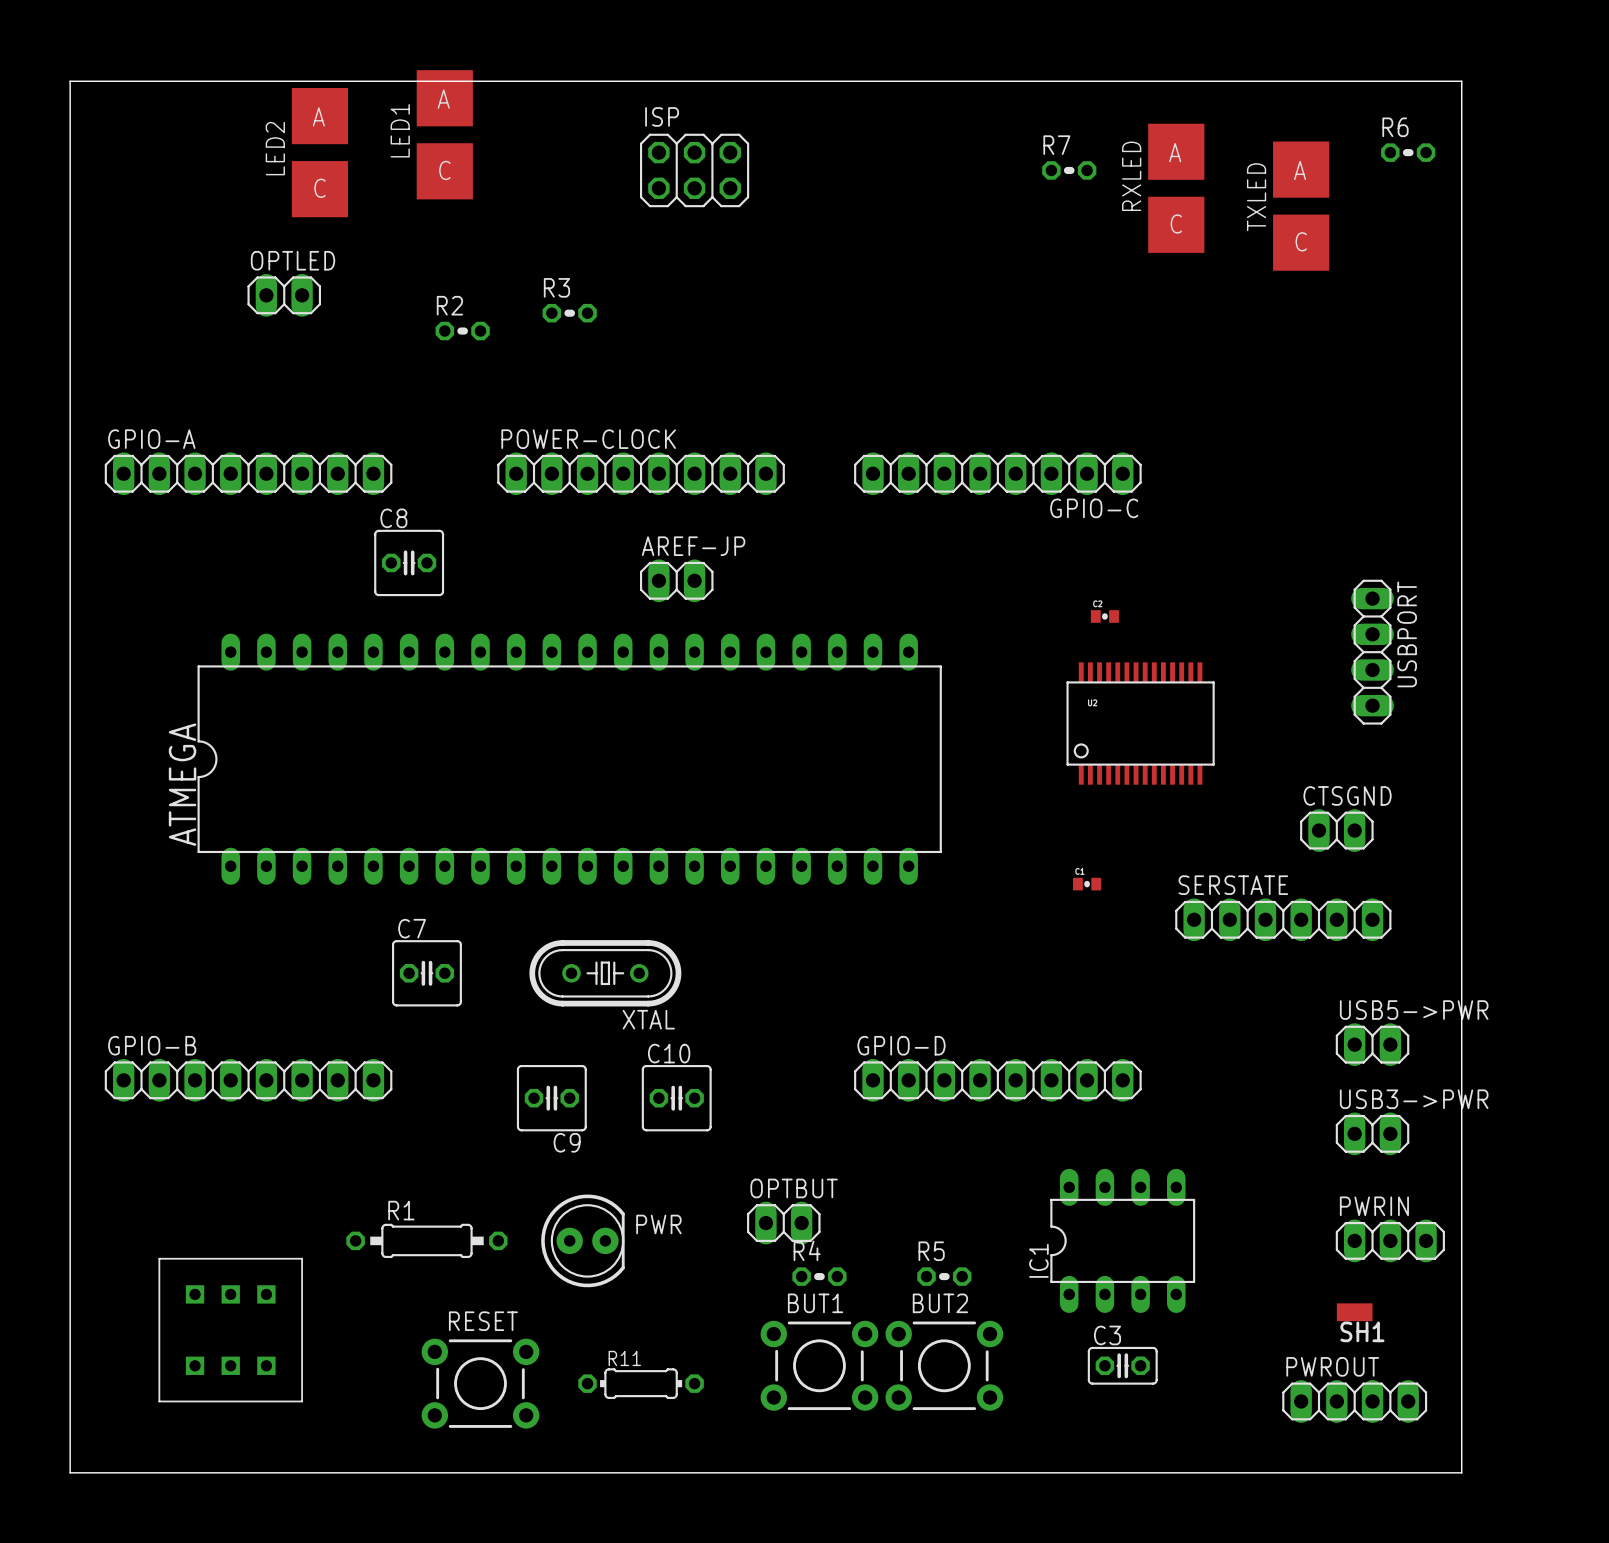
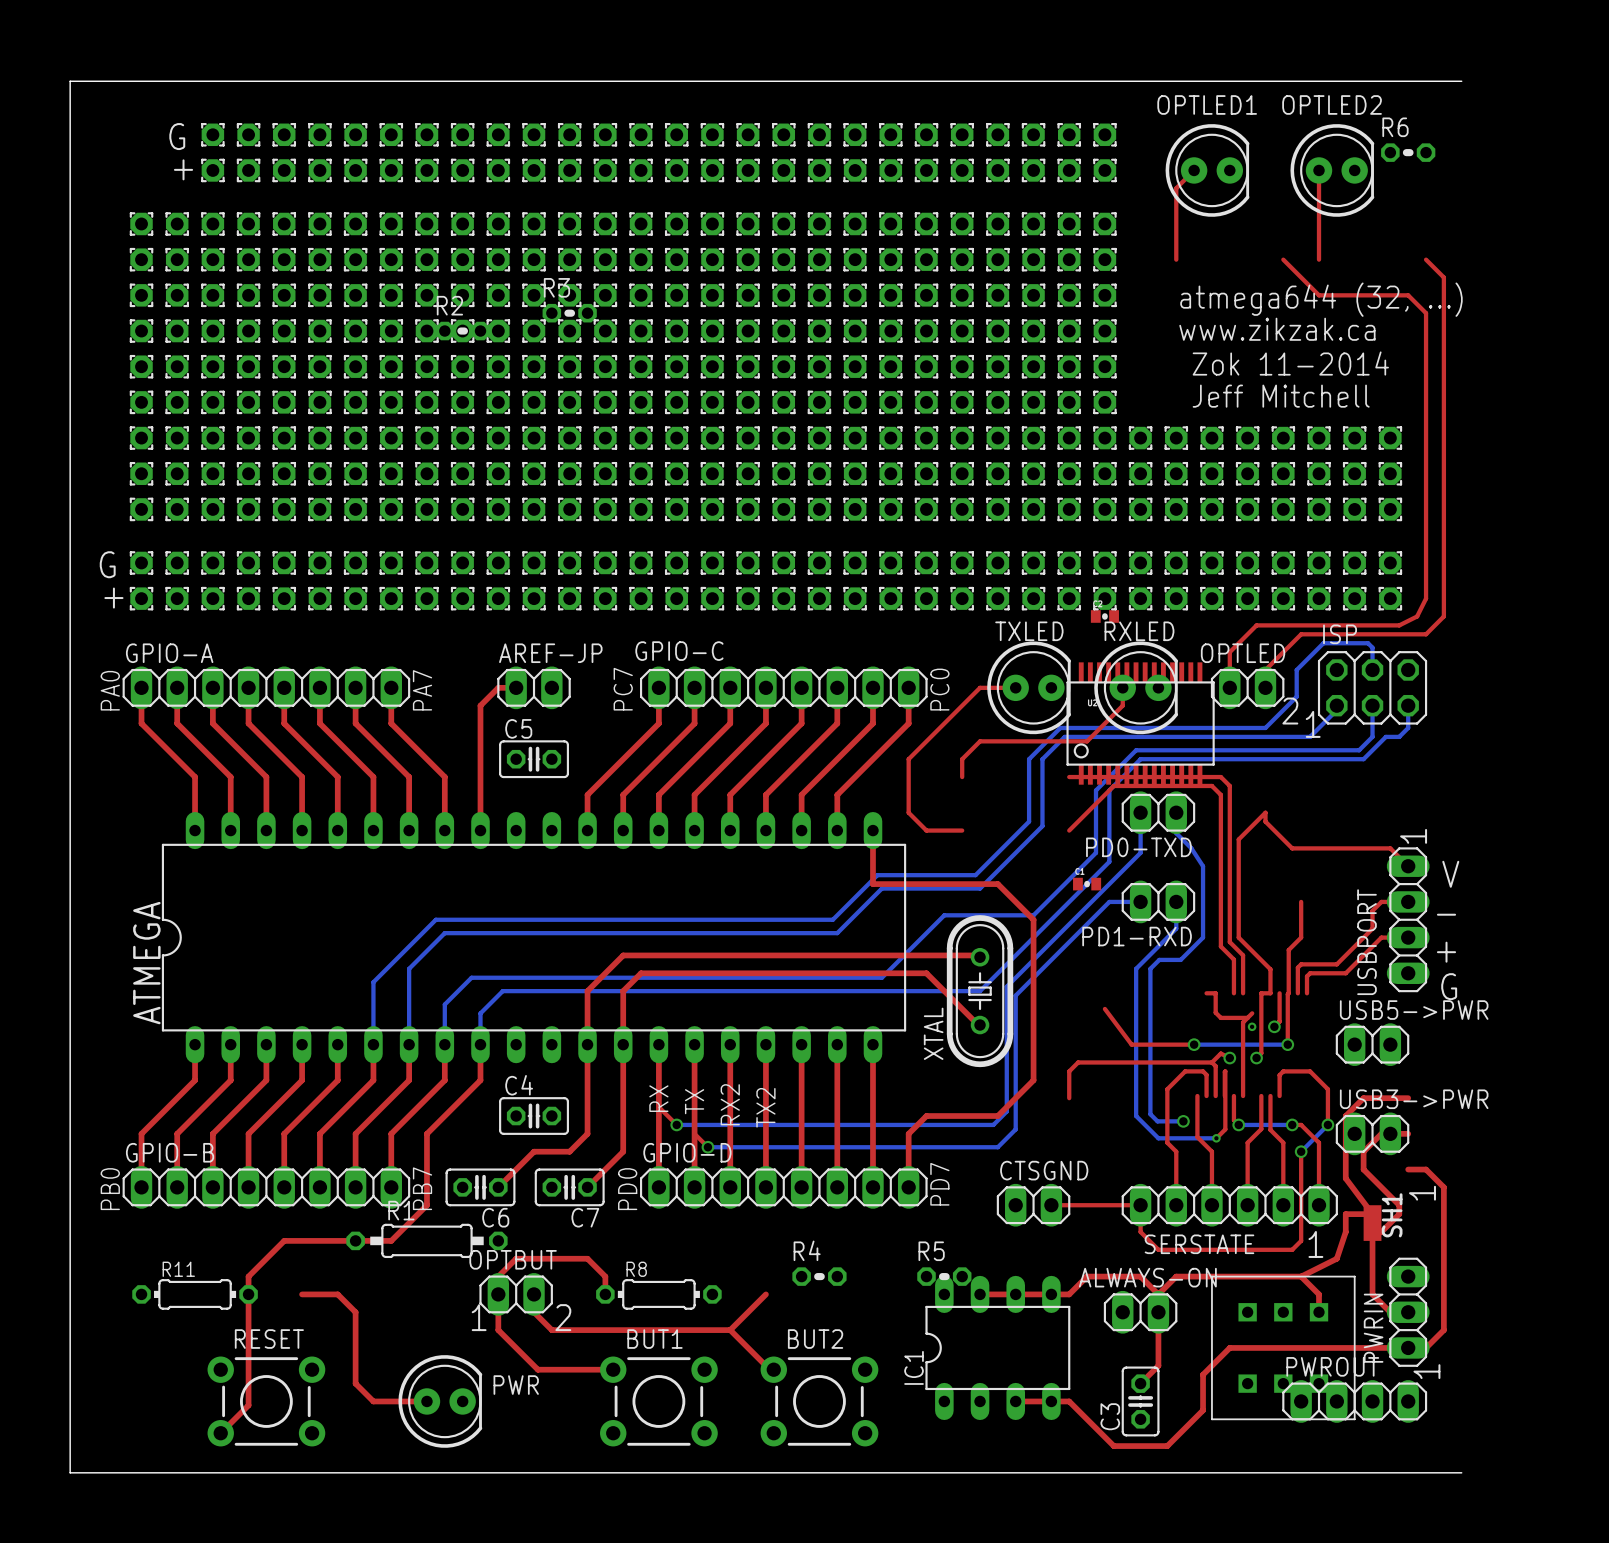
board edge: (1461, 81) (1461, 1472) -> none
part: none -> (212, 134)
part: none -> (248, 134)
part: none -> (284, 134)
part: none -> (319, 134)
part: none -> (355, 134)
part: none -> (391, 134)
part: none -> (426, 134)
LED1: (444, 134) -> none
part: none -> (462, 134)
part: none -> (498, 134)
part: none -> (534, 134)
part: none -> (569, 134)
part: none -> (605, 134)
part: none -> (641, 134)
part: none -> (676, 134)
part: none -> (712, 134)
part: none -> (748, 134)
part: none -> (783, 134)
part: none -> (819, 134)
part: none -> (855, 134)
part: none -> (890, 134)
part: none -> (926, 134)
part: none -> (962, 134)
part: none -> (997, 134)
part: none -> (1033, 134)
part: none -> (1069, 134)
part: none -> (1104, 134)
text: none -> G (177, 136)
LED2: (319, 152) -> none
text: none -> + (183, 169)
part: none -> (212, 170)
part: none -> (248, 170)
part: none -> (284, 170)
part: none -> (319, 170)
part: none -> (355, 170)
part: none -> (391, 170)
part: none -> (426, 170)
part: none -> (462, 170)
part: none -> (498, 170)
part: none -> (534, 170)
part: none -> (569, 170)
part: none -> (605, 170)
part: none -> (641, 170)
part: none -> (676, 170)
ISP: (694, 170) -> none
part: none -> (712, 170)
part: none -> (748, 170)
part: none -> (783, 170)
part: none -> (819, 170)
part: none -> (855, 170)
part: none -> (890, 170)
part: none -> (926, 170)
part: none -> (962, 170)
part: none -> (997, 170)
part: none -> (1033, 170)
R7: (1069, 170) -> none
part: none -> (1069, 170)
part: none -> (1104, 170)
top track: none -> (1194, 170) (1176, 188) (1176, 259)
OPTLED1: none -> (1207, 170)
top track: none -> (1319, 170) (1319, 259)
OPTLED2: none -> (1332, 170)
RXLED: (1176, 188) -> none
TXLED: (1301, 206) -> none
part: none -> (141, 223)
part: none -> (177, 223)
part: none -> (212, 223)
part: none -> (248, 223)
part: none -> (284, 223)
part: none -> (319, 223)
part: none -> (355, 223)
part: none -> (391, 223)
part: none -> (426, 223)
part: none -> (462, 223)
part: none -> (498, 223)
part: none -> (534, 223)
part: none -> (569, 223)
part: none -> (605, 223)
part: none -> (641, 223)
part: none -> (676, 223)
part: none -> (712, 223)
part: none -> (748, 223)
part: none -> (783, 223)
part: none -> (819, 223)
part: none -> (855, 223)
part: none -> (890, 223)
part: none -> (926, 223)
part: none -> (962, 223)
part: none -> (997, 223)
part: none -> (1033, 223)
part: none -> (1069, 223)
part: none -> (1104, 223)
part: none -> (141, 259)
part: none -> (177, 259)
part: none -> (212, 259)
part: none -> (248, 259)
part: none -> (284, 259)
part: none -> (319, 259)
part: none -> (355, 259)
part: none -> (391, 259)
part: none -> (426, 259)
part: none -> (462, 259)
part: none -> (498, 259)
part: none -> (534, 259)
part: none -> (569, 259)
part: none -> (605, 259)
part: none -> (641, 259)
part: none -> (676, 259)
part: none -> (712, 259)
part: none -> (748, 259)
part: none -> (783, 259)
part: none -> (819, 259)
part: none -> (855, 259)
part: none -> (890, 259)
part: none -> (926, 259)
part: none -> (962, 259)
part: none -> (997, 259)
part: none -> (1033, 259)
part: none -> (1069, 259)
part: none -> (1104, 259)
top track: none -> (1283, 259) (1319, 295) (1408, 295) (1426, 313) (1426, 598) (1417, 616) (1399, 625) (1256, 625) (1229, 652) (1229, 687)
top track: none -> (1426, 259) (1443, 277) (1443, 616) (1426, 634) (1301, 634) (1265, 670) (1265, 687)
part: none -> (141, 295)
part: none -> (177, 295)
part: none -> (212, 295)
part: none -> (248, 295)
OPTLED: (284, 295) -> none
part: none -> (284, 295)
part: none -> (319, 295)
part: none -> (355, 295)
part: none -> (391, 295)
part: none -> (426, 295)
part: none -> (462, 295)
part: none -> (498, 295)
part: none -> (534, 295)
part: none -> (569, 295)
part: none -> (605, 295)
part: none -> (641, 295)
part: none -> (676, 295)
part: none -> (712, 295)
part: none -> (748, 295)
part: none -> (783, 295)
part: none -> (819, 295)
part: none -> (855, 295)
part: none -> (890, 295)
part: none -> (926, 295)
part: none -> (962, 295)
part: none -> (997, 295)
part: none -> (1033, 295)
part: none -> (1069, 295)
part: none -> (1104, 295)
text: none -> atmega644 (32, ...) (1321, 299)
text: none -> www.zikzak.ca (1277, 329)
part: none -> (141, 331)
part: none -> (177, 331)
part: none -> (212, 331)
part: none -> (248, 331)
part: none -> (284, 331)
part: none -> (319, 331)
part: none -> (355, 331)
part: none -> (391, 331)
part: none -> (426, 331)
part: none -> (462, 331)
part: none -> (498, 331)
part: none -> (534, 331)
part: none -> (569, 331)
part: none -> (605, 331)
part: none -> (641, 331)
part: none -> (676, 331)
part: none -> (712, 331)
part: none -> (748, 331)
part: none -> (783, 331)
part: none -> (819, 331)
part: none -> (855, 331)
part: none -> (890, 331)
part: none -> (926, 331)
part: none -> (962, 331)
part: none -> (997, 331)
part: none -> (1033, 331)
part: none -> (1069, 331)
part: none -> (1104, 331)
text: none -> Zok 11-2014 (1290, 363)
part: none -> (141, 366)
part: none -> (177, 366)
part: none -> (212, 366)
part: none -> (248, 366)
part: none -> (284, 366)
part: none -> (319, 366)
part: none -> (355, 366)
part: none -> (391, 366)
part: none -> (426, 366)
part: none -> (462, 366)
part: none -> (498, 366)
part: none -> (534, 366)
part: none -> (569, 366)
part: none -> (605, 366)
part: none -> (641, 366)
part: none -> (676, 366)
part: none -> (712, 366)
part: none -> (748, 366)
part: none -> (783, 366)
part: none -> (819, 366)
part: none -> (855, 366)
part: none -> (890, 366)
part: none -> (926, 366)
part: none -> (962, 366)
part: none -> (997, 366)
part: none -> (1033, 366)
part: none -> (1069, 366)
part: none -> (1104, 366)
text: none -> Jeff Mitchell (1281, 396)
part: none -> (141, 402)
part: none -> (177, 402)
part: none -> (212, 402)
part: none -> (248, 402)
part: none -> (284, 402)
part: none -> (319, 402)
part: none -> (355, 402)
part: none -> (391, 402)
part: none -> (426, 402)
part: none -> (462, 402)
part: none -> (498, 402)
part: none -> (534, 402)
part: none -> (569, 402)
part: none -> (605, 402)
part: none -> (641, 402)
part: none -> (676, 402)
part: none -> (712, 402)
part: none -> (748, 402)
part: none -> (783, 402)
part: none -> (819, 402)
part: none -> (855, 402)
part: none -> (890, 402)
part: none -> (926, 402)
part: none -> (962, 402)
part: none -> (997, 402)
part: none -> (1033, 402)
part: none -> (1069, 402)
part: none -> (1104, 402)
part: none -> (141, 438)
part: none -> (177, 438)
part: none -> (212, 438)
part: none -> (248, 438)
part: none -> (284, 438)
part: none -> (319, 438)
part: none -> (355, 438)
part: none -> (391, 438)
part: none -> (426, 438)
part: none -> (462, 438)
part: none -> (498, 438)
part: none -> (534, 438)
part: none -> (569, 438)
part: none -> (605, 438)
part: none -> (641, 438)
part: none -> (676, 438)
part: none -> (712, 438)
part: none -> (748, 438)
part: none -> (783, 438)
part: none -> (819, 438)
part: none -> (855, 438)
part: none -> (890, 438)
part: none -> (926, 438)
part: none -> (962, 438)
part: none -> (997, 438)
part: none -> (1033, 438)
part: none -> (1069, 438)
part: none -> (1104, 438)
part: none -> (1140, 438)
part: none -> (1176, 438)
part: none -> (1211, 438)
part: none -> (1247, 438)
part: none -> (1283, 438)
part: none -> (1319, 438)
part: none -> (1354, 438)
part: none -> (1390, 438)
part: none -> (141, 473)
part: none -> (177, 473)
part: none -> (212, 473)
GPIO-A position: (248, 473) -> (266, 687)
part: none -> (248, 473)
part: none -> (284, 473)
part: none -> (319, 473)
part: none -> (355, 473)
part: none -> (391, 473)
part: none -> (426, 473)
part: none -> (462, 473)
part: none -> (498, 473)
part: none -> (534, 473)
part: none -> (569, 473)
part: none -> (605, 473)
POWER-CLOCK: (641, 473) -> none
part: none -> (641, 473)
part: none -> (676, 473)
part: none -> (712, 473)
part: none -> (748, 473)
part: none -> (783, 473)
part: none -> (819, 473)
part: none -> (855, 473)
part: none -> (890, 473)
part: none -> (926, 473)
part: none -> (962, 473)
GPIO-C position: (997, 473) -> (783, 687)
part: none -> (997, 473)
part: none -> (1033, 473)
part: none -> (1069, 473)
part: none -> (1104, 473)
part: none -> (1140, 473)
part: none -> (1176, 473)
part: none -> (1211, 473)
part: none -> (1247, 473)
part: none -> (1283, 473)
part: none -> (1319, 473)
part: none -> (1354, 473)
part: none -> (1390, 473)
GPIO-C name position: GPIO-C (1094, 508) -> GPIO-C (679, 651)
part: none -> (141, 509)
part: none -> (177, 509)
part: none -> (212, 509)
part: none -> (248, 509)
part: none -> (284, 509)
part: none -> (319, 509)
part: none -> (355, 509)
part: none -> (391, 509)
part: none -> (426, 509)
part: none -> (462, 509)
part: none -> (498, 509)
part: none -> (534, 509)
part: none -> (569, 509)
part: none -> (605, 509)
part: none -> (641, 509)
part: none -> (676, 509)
part: none -> (712, 509)
part: none -> (748, 509)
part: none -> (783, 509)
part: none -> (819, 509)
part: none -> (855, 509)
part: none -> (890, 509)
part: none -> (926, 509)
part: none -> (962, 509)
part: none -> (997, 509)
part: none -> (1033, 509)
part: none -> (1069, 509)
part: none -> (1104, 509)
part: none -> (1140, 509)
part: none -> (1176, 509)
part: none -> (1211, 509)
part: none -> (1247, 509)
part: none -> (1283, 509)
part: none -> (1319, 509)
part: none -> (1354, 509)
part: none -> (1390, 509)
part: none -> (141, 562)
part: none -> (177, 562)
part: none -> (212, 562)
part: none -> (248, 562)
part: none -> (284, 562)
part: none -> (319, 562)
part: none -> (355, 562)
part: none -> (391, 562)
C8: (409, 562) -> none
part: none -> (426, 562)
part: none -> (462, 562)
part: none -> (498, 562)
part: none -> (534, 562)
part: none -> (569, 562)
part: none -> (605, 562)
part: none -> (641, 562)
part: none -> (676, 562)
part: none -> (712, 562)
part: none -> (748, 562)
part: none -> (783, 562)
part: none -> (819, 562)
part: none -> (855, 562)
part: none -> (890, 562)
part: none -> (926, 562)
part: none -> (962, 562)
part: none -> (997, 562)
part: none -> (1033, 562)
part: none -> (1069, 562)
part: none -> (1104, 562)
part: none -> (1140, 562)
part: none -> (1176, 562)
part: none -> (1211, 562)
part: none -> (1247, 562)
part: none -> (1283, 562)
part: none -> (1319, 562)
part: none -> (1354, 562)
part: none -> (1390, 562)
text: none -> G (107, 564)
AREF-JP position: (676, 580) -> (534, 687)
text: none -> + (113, 598)
part: none -> (141, 598)
part: none -> (177, 598)
part: none -> (212, 598)
part: none -> (248, 598)
part: none -> (284, 598)
part: none -> (319, 598)
part: none -> (355, 598)
part: none -> (391, 598)
part: none -> (426, 598)
part: none -> (462, 598)
part: none -> (498, 598)
part: none -> (534, 598)
part: none -> (569, 598)
part: none -> (605, 598)
part: none -> (641, 598)
part: none -> (676, 598)
part: none -> (712, 598)
part: none -> (748, 598)
part: none -> (783, 598)
part: none -> (819, 598)
part: none -> (855, 598)
part: none -> (890, 598)
part: none -> (926, 598)
part: none -> (962, 598)
part: none -> (997, 598)
part: none -> (1033, 598)
part: none -> (1069, 598)
part: none -> (1104, 598)
part: none -> (1140, 598)
part: none -> (1176, 598)
part: none -> (1211, 598)
part: none -> (1247, 598)
part: none -> (1283, 598)
part: none -> (1319, 598)
part: none -> (1354, 598)
part: none -> (1390, 598)
USBPORT name position: USBPORT (1407, 634) -> USBPORT (1367, 942)
USBPORT position: (1372, 652) -> (1408, 919)
bottom track: none -> (1372, 670) (1372, 647) (1368, 643) (1323, 643) (1296, 670) (1296, 696) (1265, 727) (1060, 727) (1029, 759) (1029, 821) (975, 875) (877, 875) (832, 919) (435, 919) (373, 982) (373, 1044)
top track: none -> (141, 687) (141, 723) (195, 777) (195, 830)
top track: none -> (177, 687) (177, 723) (230, 777) (230, 830)
top track: none -> (212, 687) (212, 723) (266, 777) (266, 830)
top track: none -> (248, 687) (248, 723) (302, 777) (302, 830)
top track: none -> (284, 687) (284, 723) (337, 777) (337, 830)
top track: none -> (319, 687) (319, 723) (373, 777) (373, 830)
top track: none -> (355, 687) (355, 723) (409, 777) (409, 830)
top track: none -> (391, 687) (391, 723) (444, 777) (444, 830)
top track: none -> (516, 687) (498, 687) (480, 705) (480, 830)
top track: none -> (658, 687) (658, 723) (587, 794) (587, 830)
top track: none -> (694, 687) (694, 723) (623, 794) (623, 830)
top track: none -> (730, 687) (730, 723) (658, 794) (658, 830)
top track: none -> (765, 687) (765, 723) (694, 794) (694, 830)
top track: none -> (801, 687) (801, 723) (730, 794) (730, 830)
top track: none -> (837, 687) (837, 723) (765, 794) (765, 830)
top track: none -> (872, 687) (872, 723) (801, 794) (801, 830)
top track: none -> (908, 687) (908, 723) (837, 794) (837, 830)
top track: none -> (1015, 687) (980, 687) (908, 759) (908, 812) (926, 830) (962, 830)
TXLED: none -> (1029, 687)
top track: none -> (1122, 687) (1122, 705) (1087, 741) (980, 741) (962, 759) (962, 777)
RXLED: none -> (1136, 687)
OPTLED: none -> (1247, 687)
ISP: none -> (1372, 687)
text: none -> PC7 (623, 689)
text: none -> PC0 (939, 689)
text: none -> PA0 (110, 690)
text: none -> PA7 (422, 690)
bottom track: none -> (1336, 705) (1336, 710) (1310, 736) (1064, 736) (1042, 759) (1042, 826) (980, 888) (881, 888) (837, 933) (444, 933) (409, 968) (409, 1044)
bottom track: none -> (1372, 705) (1372, 736) (1359, 750) (1136, 750) (1096, 790) (1096, 852) (1033, 915) (944, 915) (881, 977) (471, 977) (444, 1004) (444, 1044)
bottom track: none -> (1408, 705) (1408, 727) (1399, 736) (1385, 736) (1363, 759) (1140, 759) (1109, 790) (1109, 861) (980, 991) (502, 991) (480, 1013) (480, 1044)
text: none -> 2 (1290, 711)
text: none -> 1 (1313, 724)
C5: none -> (534, 759)
ATMEGA position: (569, 759) -> (534, 937)
top track: none -> (1069, 777) (1220, 777) (1229, 785) (1229, 942) (1243, 955) (1243, 993)
bottom track: none -> (1140, 812) (1140, 852) (1006, 986) (1006, 1111) (993, 1124) (676, 1124)
PD0-TXD: none -> (1158, 812)
bottom track: none -> (1176, 812) (1176, 833) (1191, 848) (1203, 866) (1203, 937) (1180, 959) (1159, 959) (1150, 968) (1150, 1114) (1157, 1121) (1183, 1121)
top track: none -> (872, 830) (872, 884) (997, 884) (1033, 919) (1033, 1080) (997, 1116) (926, 1116) (908, 1133) (908, 1187)
top track: none -> (1069, 830) (1113, 785) (1211, 785) (1220, 794) (1220, 946) (1233, 959) (1233, 993)
CTSGND: (1336, 830) -> none
text: none -> 1 (1413, 836)
top track: none -> (1408, 866) (1390, 848) (1292, 848) (1265, 821) (1265, 812) (1238, 839) (1238, 937) (1270, 969) (1270, 993) (1261, 993) (1261, 1053) (1256, 1058)
text: none -> V (1450, 874)
SERSTATE name position: SERSTATE (1233, 885) -> SERSTATE (1199, 1244)
bottom track: none -> (1140, 901) (1109, 901) (1015, 995) (1015, 1129) (997, 1147) (707, 1147)
PD1-RXD: none -> (1158, 901)
bottom track: none -> (1176, 901) (1176, 928) (1136, 968) (1136, 1116) (1158, 1138) (1216, 1138)
top track: none -> (1301, 901) (1301, 937) (1288, 950) (1287, 1044)
top track: none -> (1408, 901) (1381, 901) (1372, 910) (1372, 928) (1336, 964) (1301, 964) (1297, 967) (1297, 993)
text: none -> - (1446, 914)
SERSTATE position: (1283, 919) -> (1229, 1205)
C7 name position: C7 (412, 928) -> C7 (585, 1217)
top track: none -> (1408, 937) (1381, 937) (1345, 973) (1310, 973) (1306, 976) (1306, 993)
C7 footprint: [392, 940, 462, 1007] -> [534, 1168, 605, 1207]
text: none -> + (1446, 952)
top track: none -> (980, 957) (978, 955) (623, 955) (587, 991) (587, 1133) (569, 1151) (534, 1151) (498, 1187)
XTAL: (605, 973) -> none
text: none -> G (1449, 986)
XTAL: none -> (980, 991)
top track: none -> (1206, 993) (1215, 993) (1215, 1012) (1220, 1017) (1247, 1017)
top track: none -> (1279, 993) (1279, 1021) (1274, 1026)
top track: none -> (1104, 1008) (1131, 1044) (1194, 1044)
top track: none -> (1252, 1013) (1243, 1022) (1243, 1096)
top track: none -> (980, 1025) (926, 973) (641, 973) (623, 991) (623, 1151) (587, 1187)
via: none -> (1252, 1026)
via: none -> (1274, 1026)
top track: none -> (195, 1044) (195, 1080) (141, 1133) (141, 1187)
top track: none -> (230, 1044) (230, 1080) (177, 1133) (177, 1187)
top track: none -> (266, 1044) (266, 1080) (212, 1133) (212, 1187)
top track: none -> (302, 1044) (302, 1080) (248, 1133) (248, 1187)
top track: none -> (337, 1044) (337, 1080) (284, 1133) (284, 1187)
top track: none -> (373, 1044) (373, 1080) (319, 1133) (319, 1187)
top track: none -> (409, 1044) (409, 1080) (355, 1133) (355, 1187)
top track: none -> (444, 1044) (444, 1080) (391, 1133) (391, 1187)
top track: none -> (480, 1044) (480, 1080) (426, 1133) (426, 1205) (391, 1240) (284, 1240) (248, 1276) (248, 1405) (220, 1433)
top track: none -> (730, 1044) (730, 1187)
top track: none -> (765, 1044) (765, 1187)
top track: none -> (801, 1044) (801, 1187)
top track: none -> (837, 1044) (837, 1187)
top track: none -> (872, 1044) (872, 1187)
bottom track: none -> (1194, 1044) (1287, 1044)
via: none -> (1194, 1044)
via: none -> (1287, 1044)
top track: none -> (1229, 1058) (1220, 1053) (1211, 1062)
via: none -> (1229, 1058)
via: none -> (1256, 1058)
top track: none -> (1211, 1062) (1215, 1066) (1215, 1096)
top track: none -> (1211, 1062) (1078, 1062) (1069, 1071) (1069, 1098)
GPIO-B position: (248, 1080) -> (266, 1187)
GPIO-D position: (997, 1080) -> (783, 1187)
top track: none -> (1197, 1096) (1197, 1137) (1211, 1151) (1211, 1205)
top track: none -> (1206, 1096) (1206, 1074) (1203, 1071) (1185, 1071) (1167, 1089) (1167, 1142) (1176, 1151) (1176, 1205)
top track: none -> (1224, 1096) (1225, 1071) (1225, 1129) (1216, 1138)
top track: none -> (1233, 1096) (1233, 1120) (1238, 1124)
top track: none -> (1261, 1096) (1261, 1129) (1247, 1142) (1247, 1205)
top track: none -> (1270, 1096) (1270, 1129) (1283, 1142) (1283, 1205)
top track: none -> (1279, 1096) (1279, 1075) (1283, 1071) (1310, 1071) (1327, 1089) (1327, 1124)
C9: (551, 1098) -> none
text: none -> RX (658, 1098)
C10: (676, 1098) -> none
top track: none -> (1408, 1098) (1363, 1098) (1345, 1116) (1345, 1178) (1372, 1214) (1345, 1214) (1345, 1231) (1336, 1258) (1301, 1276)
text: none -> TX (694, 1101)
text: none -> RX2 (730, 1104)
text: none -> TX2 (765, 1107)
C4: none -> (534, 1116)
via: none -> (1183, 1121)
top track: none -> (676, 1124) (658, 1107) (658, 1044) (658, 1187)
via: none -> (676, 1124)
bottom track: none -> (1238, 1124) (1292, 1124)
via: none -> (1238, 1124)
top track: none -> (1292, 1124) (1301, 1124) (1319, 1142) (1319, 1205)
via: none -> (1292, 1124)
bottom track: none -> (1327, 1124) (1301, 1151)
via: none -> (1327, 1124)
top track: none -> (1408, 1133) (1381, 1133) (1363, 1151) (1363, 1169) (1399, 1205) (1399, 1214) (1381, 1231) (1372, 1231) (1372, 1294) (1390, 1312) (1408, 1312)
via: none -> (1216, 1138)
top track: none -> (707, 1147) (694, 1133) (694, 1044) (694, 1187)
via: none -> (707, 1147)
top track: none -> (1301, 1151) (1301, 1240) (1292, 1249) (1158, 1249) (1140, 1231) (1140, 1205) (1051, 1205)
via: none -> (1301, 1151)
top track: none -> (1408, 1169) (1426, 1169) (1443, 1187) (1443, 1330) (1426, 1347) (1229, 1347) (1203, 1374) (1203, 1410) (1167, 1446) (1113, 1446) (1069, 1401) (1015, 1401)
text: none -> PD7 (939, 1184)
C6: none -> (480, 1187)
text: none -> PB7 (422, 1188)
OPTBUT name position: OPTBUT (794, 1188) -> OPTBUT (513, 1259)
text: none -> PB0 (110, 1189)
text: none -> PD0 (627, 1189)
text: none -> 1 (1422, 1193)
CTSGND: none -> (1033, 1205)
PWRIN name position: PWRIN (1374, 1206) -> PWRIN (1373, 1328)
OPTBUT position: (783, 1223) -> (516, 1294)
PWR position: (583, 1240) -> (440, 1401)
IC1 position: (1122, 1240) -> (997, 1347)
PWRIN rotation: 0° (1390, 1240) -> 90° clockwise (1408, 1312)
PWRIN position: (1390, 1240) -> (1408, 1312)
text: none -> 1 (1315, 1244)
top track: none -> (1301, 1276) (1176, 1276) (1158, 1294)
top track: none -> (1301, 1276) (1319, 1294) (1319, 1312)
top track: none -> (302, 1294) (337, 1294) (355, 1312) (355, 1383) (373, 1401) (426, 1401)
top track: none -> (534, 1294) (534, 1312) (551, 1330) (730, 1330)
top track: none -> (605, 1294) (605, 1276) (587, 1258) (516, 1258) (498, 1276) (498, 1330) (537, 1369) (613, 1369)
R8: none -> (658, 1294)
top track: none -> (765, 1294) (730, 1330)
top track: none -> (980, 1294) (1069, 1294) (1087, 1276) (1140, 1276) (1158, 1294)
top track: none -> (1158, 1294) (1158, 1365) (1140, 1383)
ALWAYS-ON: none -> (1140, 1312)
SH1 rotation: 0° (1354, 1312) -> 90° clockwise (1372, 1223)
SH1 position: (1354, 1312) -> (1372, 1223)
text: none -> 1 (479, 1317)
text: none -> 2 (563, 1317)
part: (230, 1330) -> none
top track: none -> (730, 1330) (769, 1369) (773, 1369)
SH1 name position: SH1 (1362, 1331) -> SH1 (1392, 1215)
C3 name position: C3 (1107, 1335) -> C3 (1110, 1416)
part: none -> (1283, 1347)
BUT1 position: (819, 1365) -> (658, 1401)
BUT2 position: (944, 1365) -> (819, 1401)
C3 rotation: 0° (1122, 1365) -> 90° clockwise (1140, 1401)
text: none -> 1 (1426, 1371)
RESET position: (480, 1383) -> (266, 1401)
R11 position: (641, 1383) -> (195, 1294)

